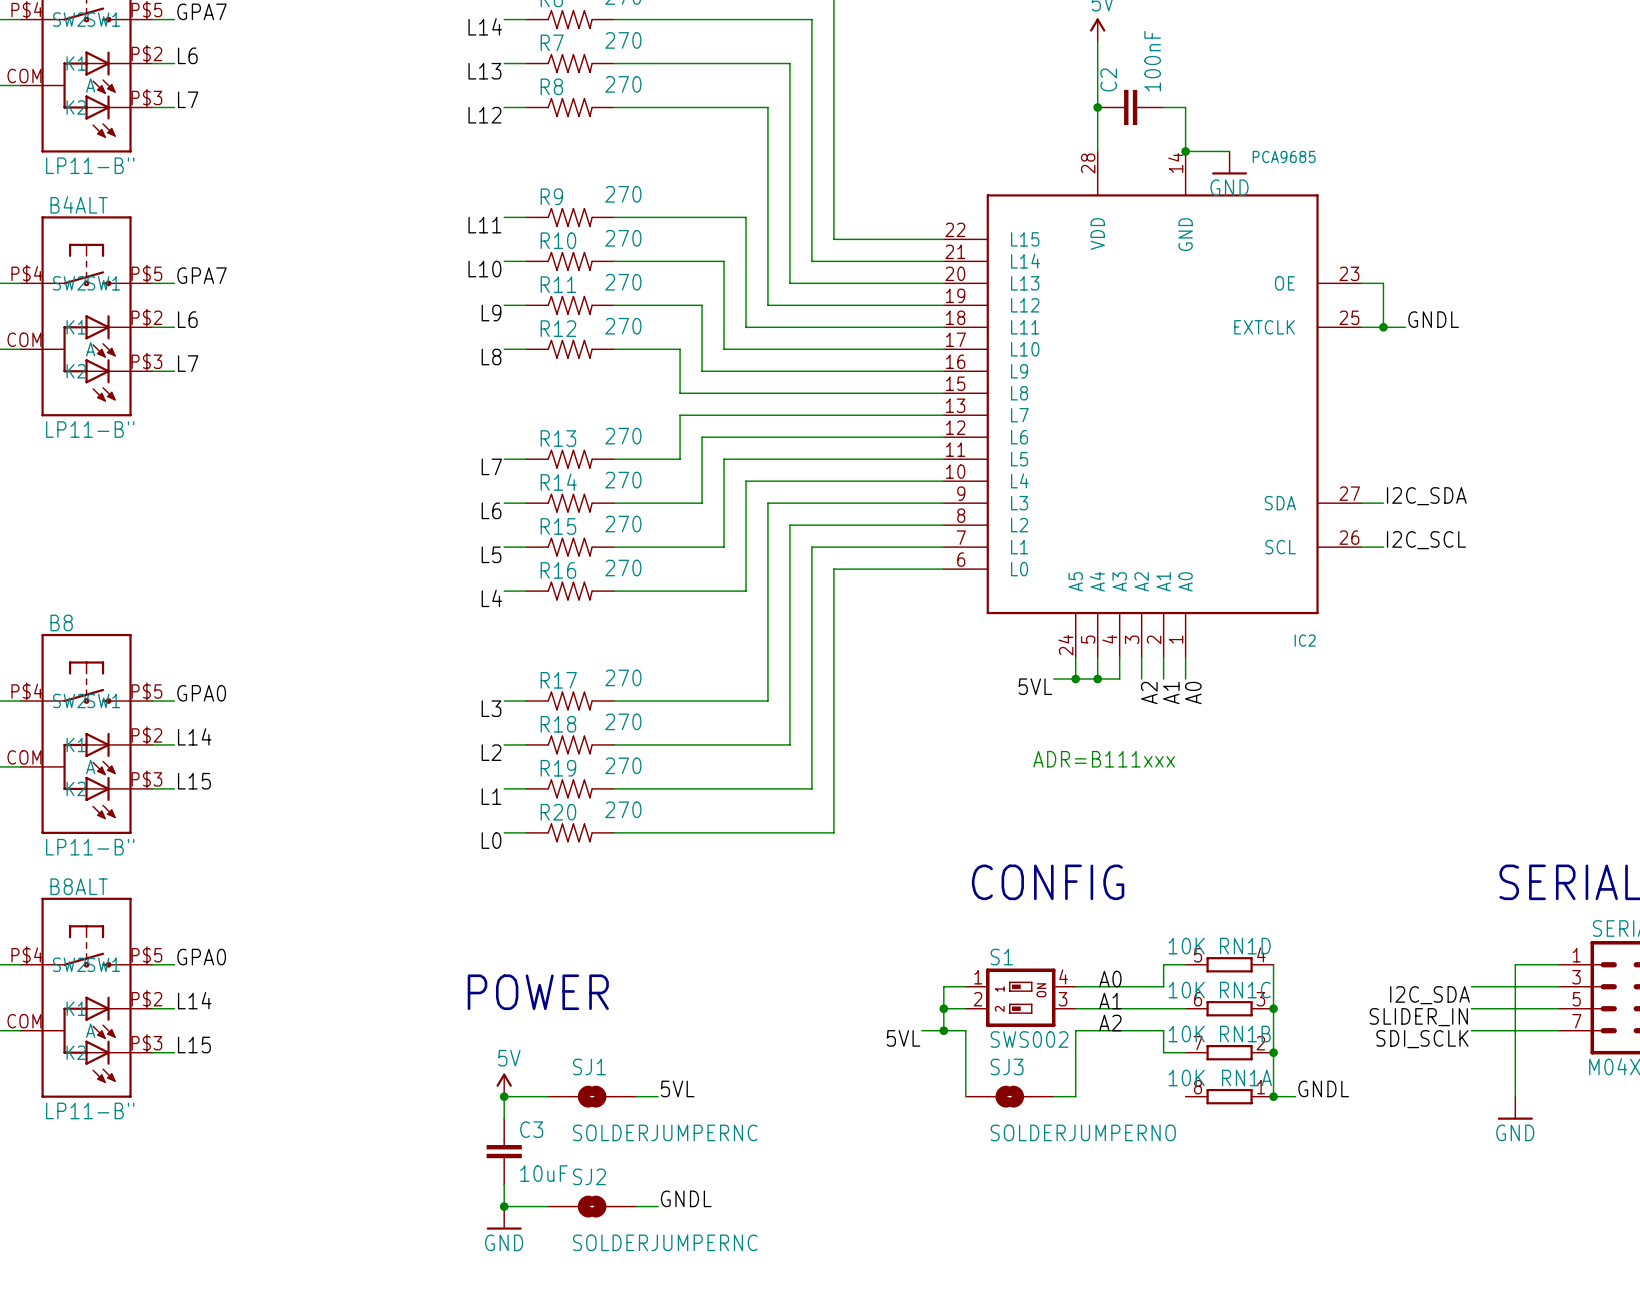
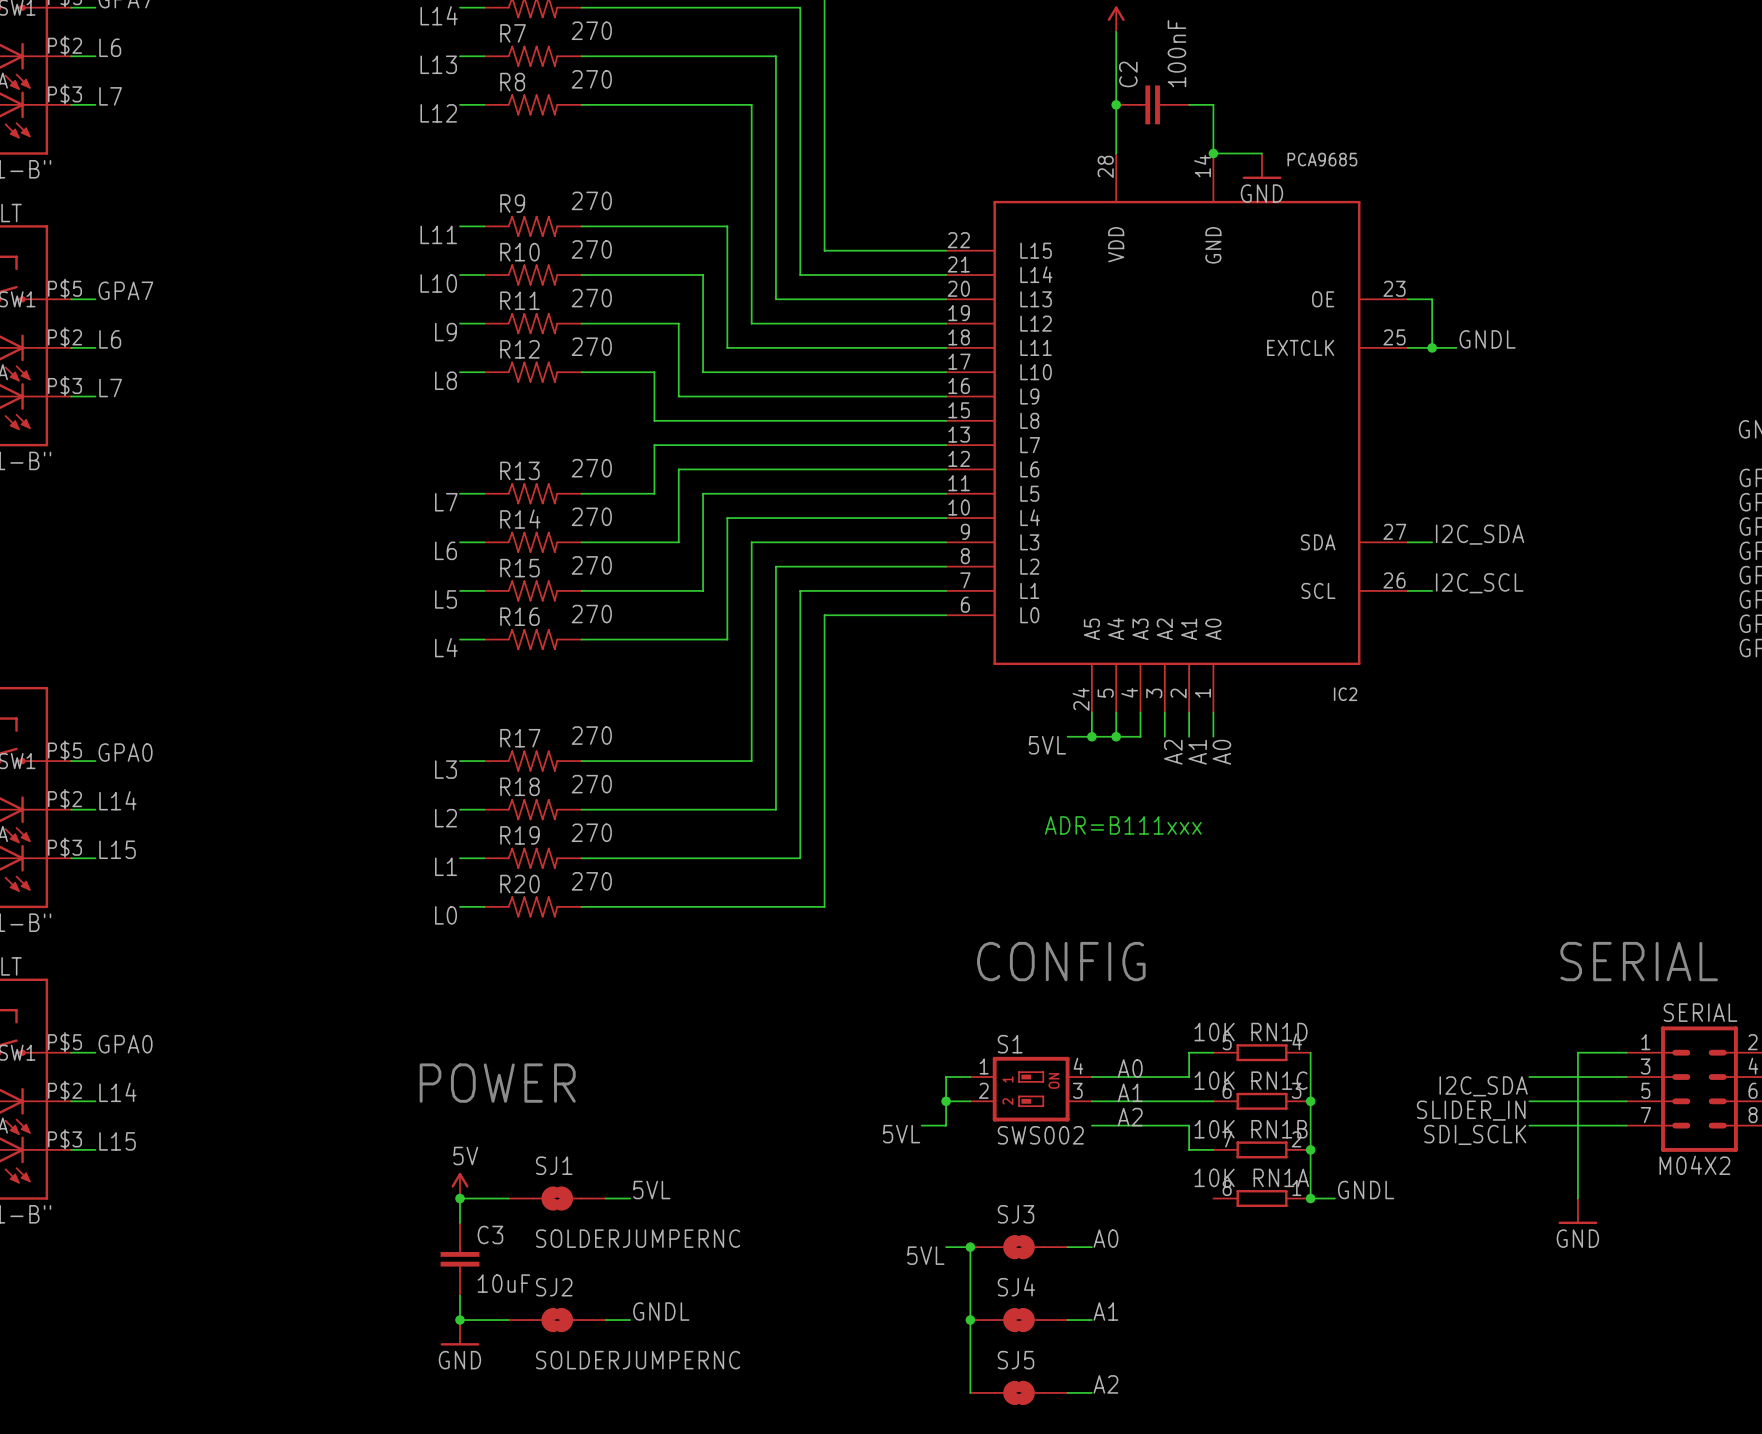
wire: (943, 1030) (965, 1030) (965, 1096) -> none
junction: (943, 1030) -> none
wire: (1075, 1030) (1075, 1096) (1053, 1096) -> none
SJ3 position: (1009, 1096) -> (1018, 1247)
SJ3 value: SOLDERJUMPERNO (1083, 1132) -> none
label: none -> A0 (1105, 1238)
wire: none -> (946, 1247) (970, 1247) (970, 1392)
junction: none -> (970, 1247)
wire: none -> (1067, 1247) (1091, 1247)
label: none -> 5VL (925, 1255)
label: none -> A1 (1105, 1311)
junction: none -> (970, 1320)
SJ4: none -> (1018, 1320)
wire: none -> (1067, 1320) (1091, 1320)
label: none -> A2 (1105, 1384)
SJ5: none -> (1018, 1392)
wire: none -> (1067, 1392) (1091, 1392)

